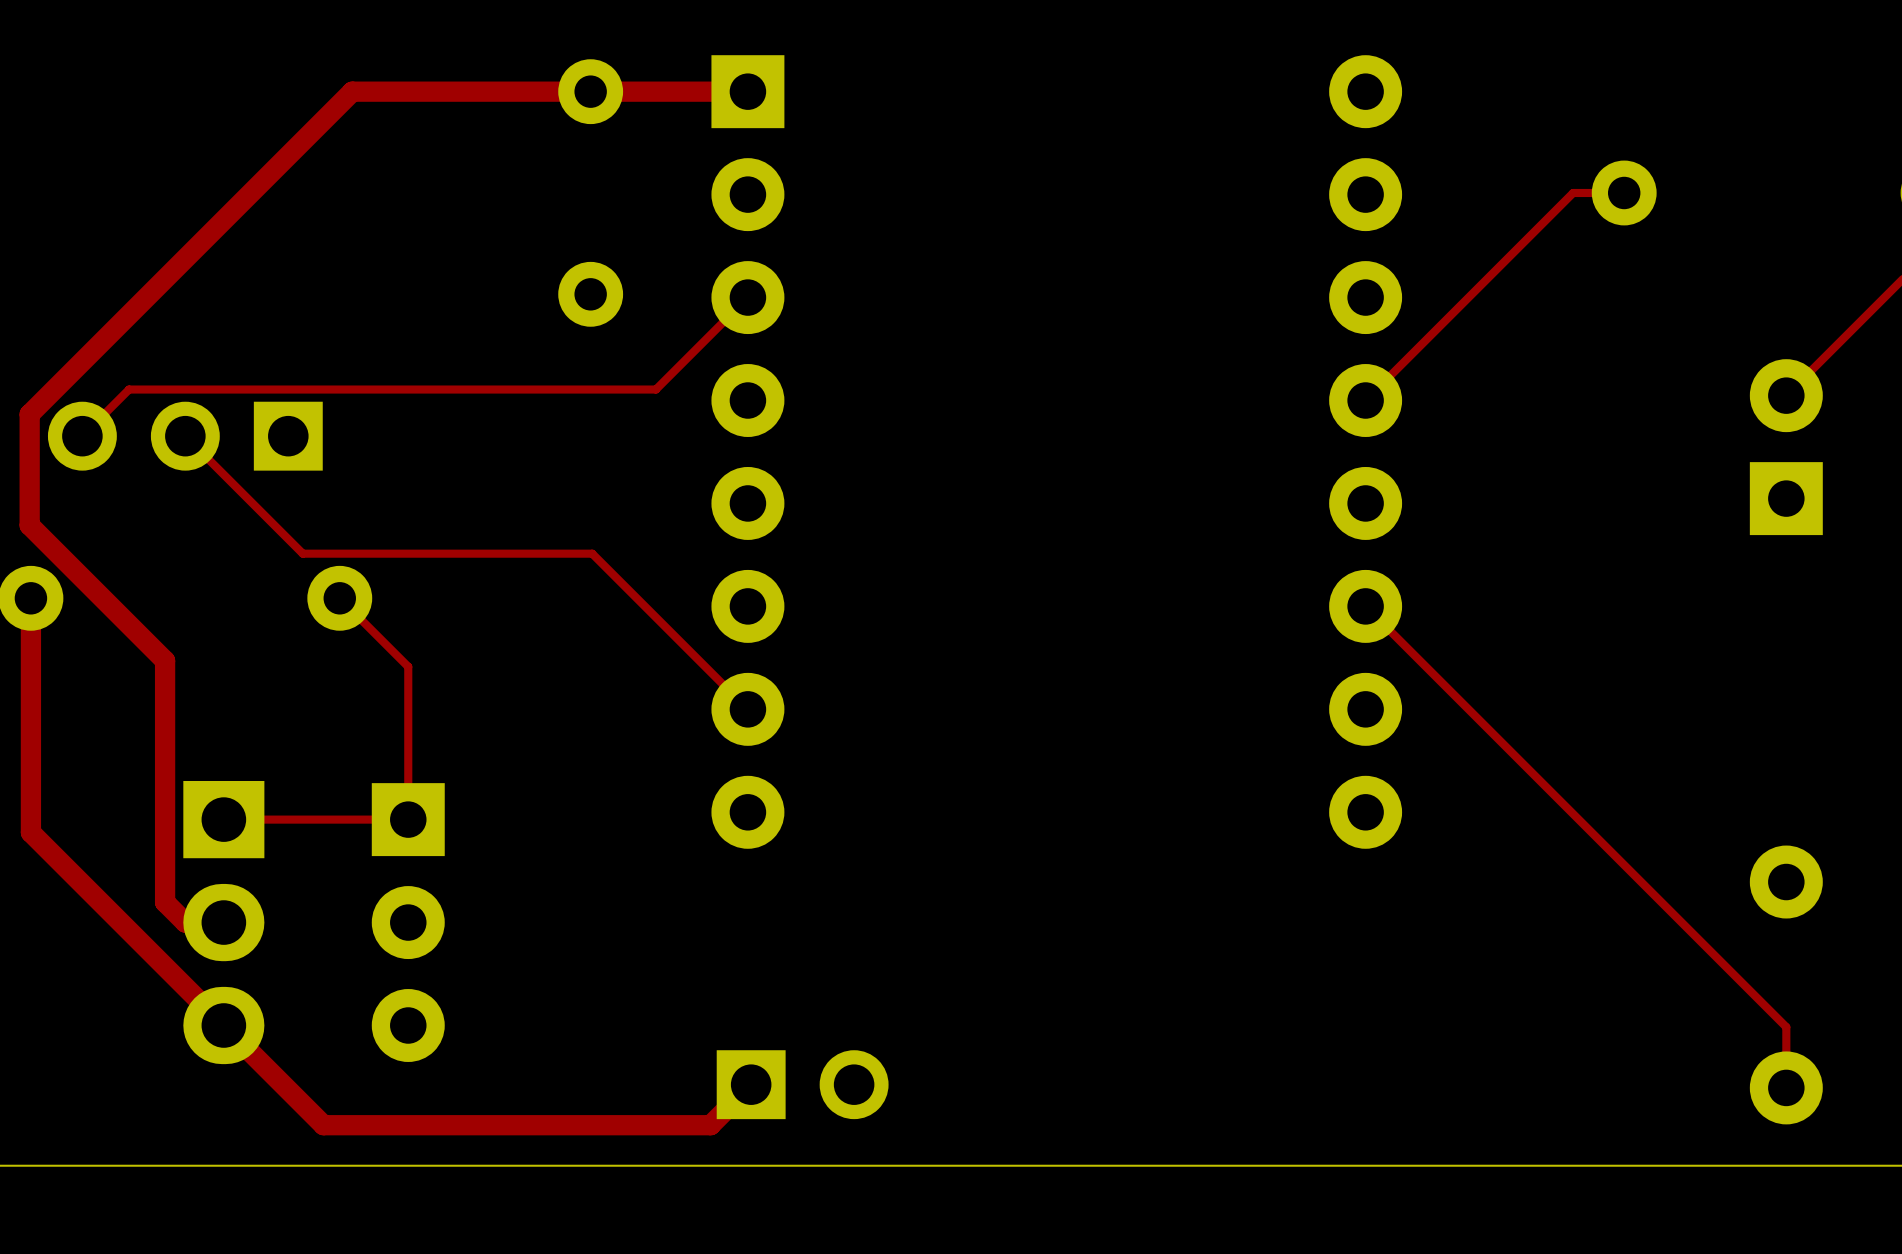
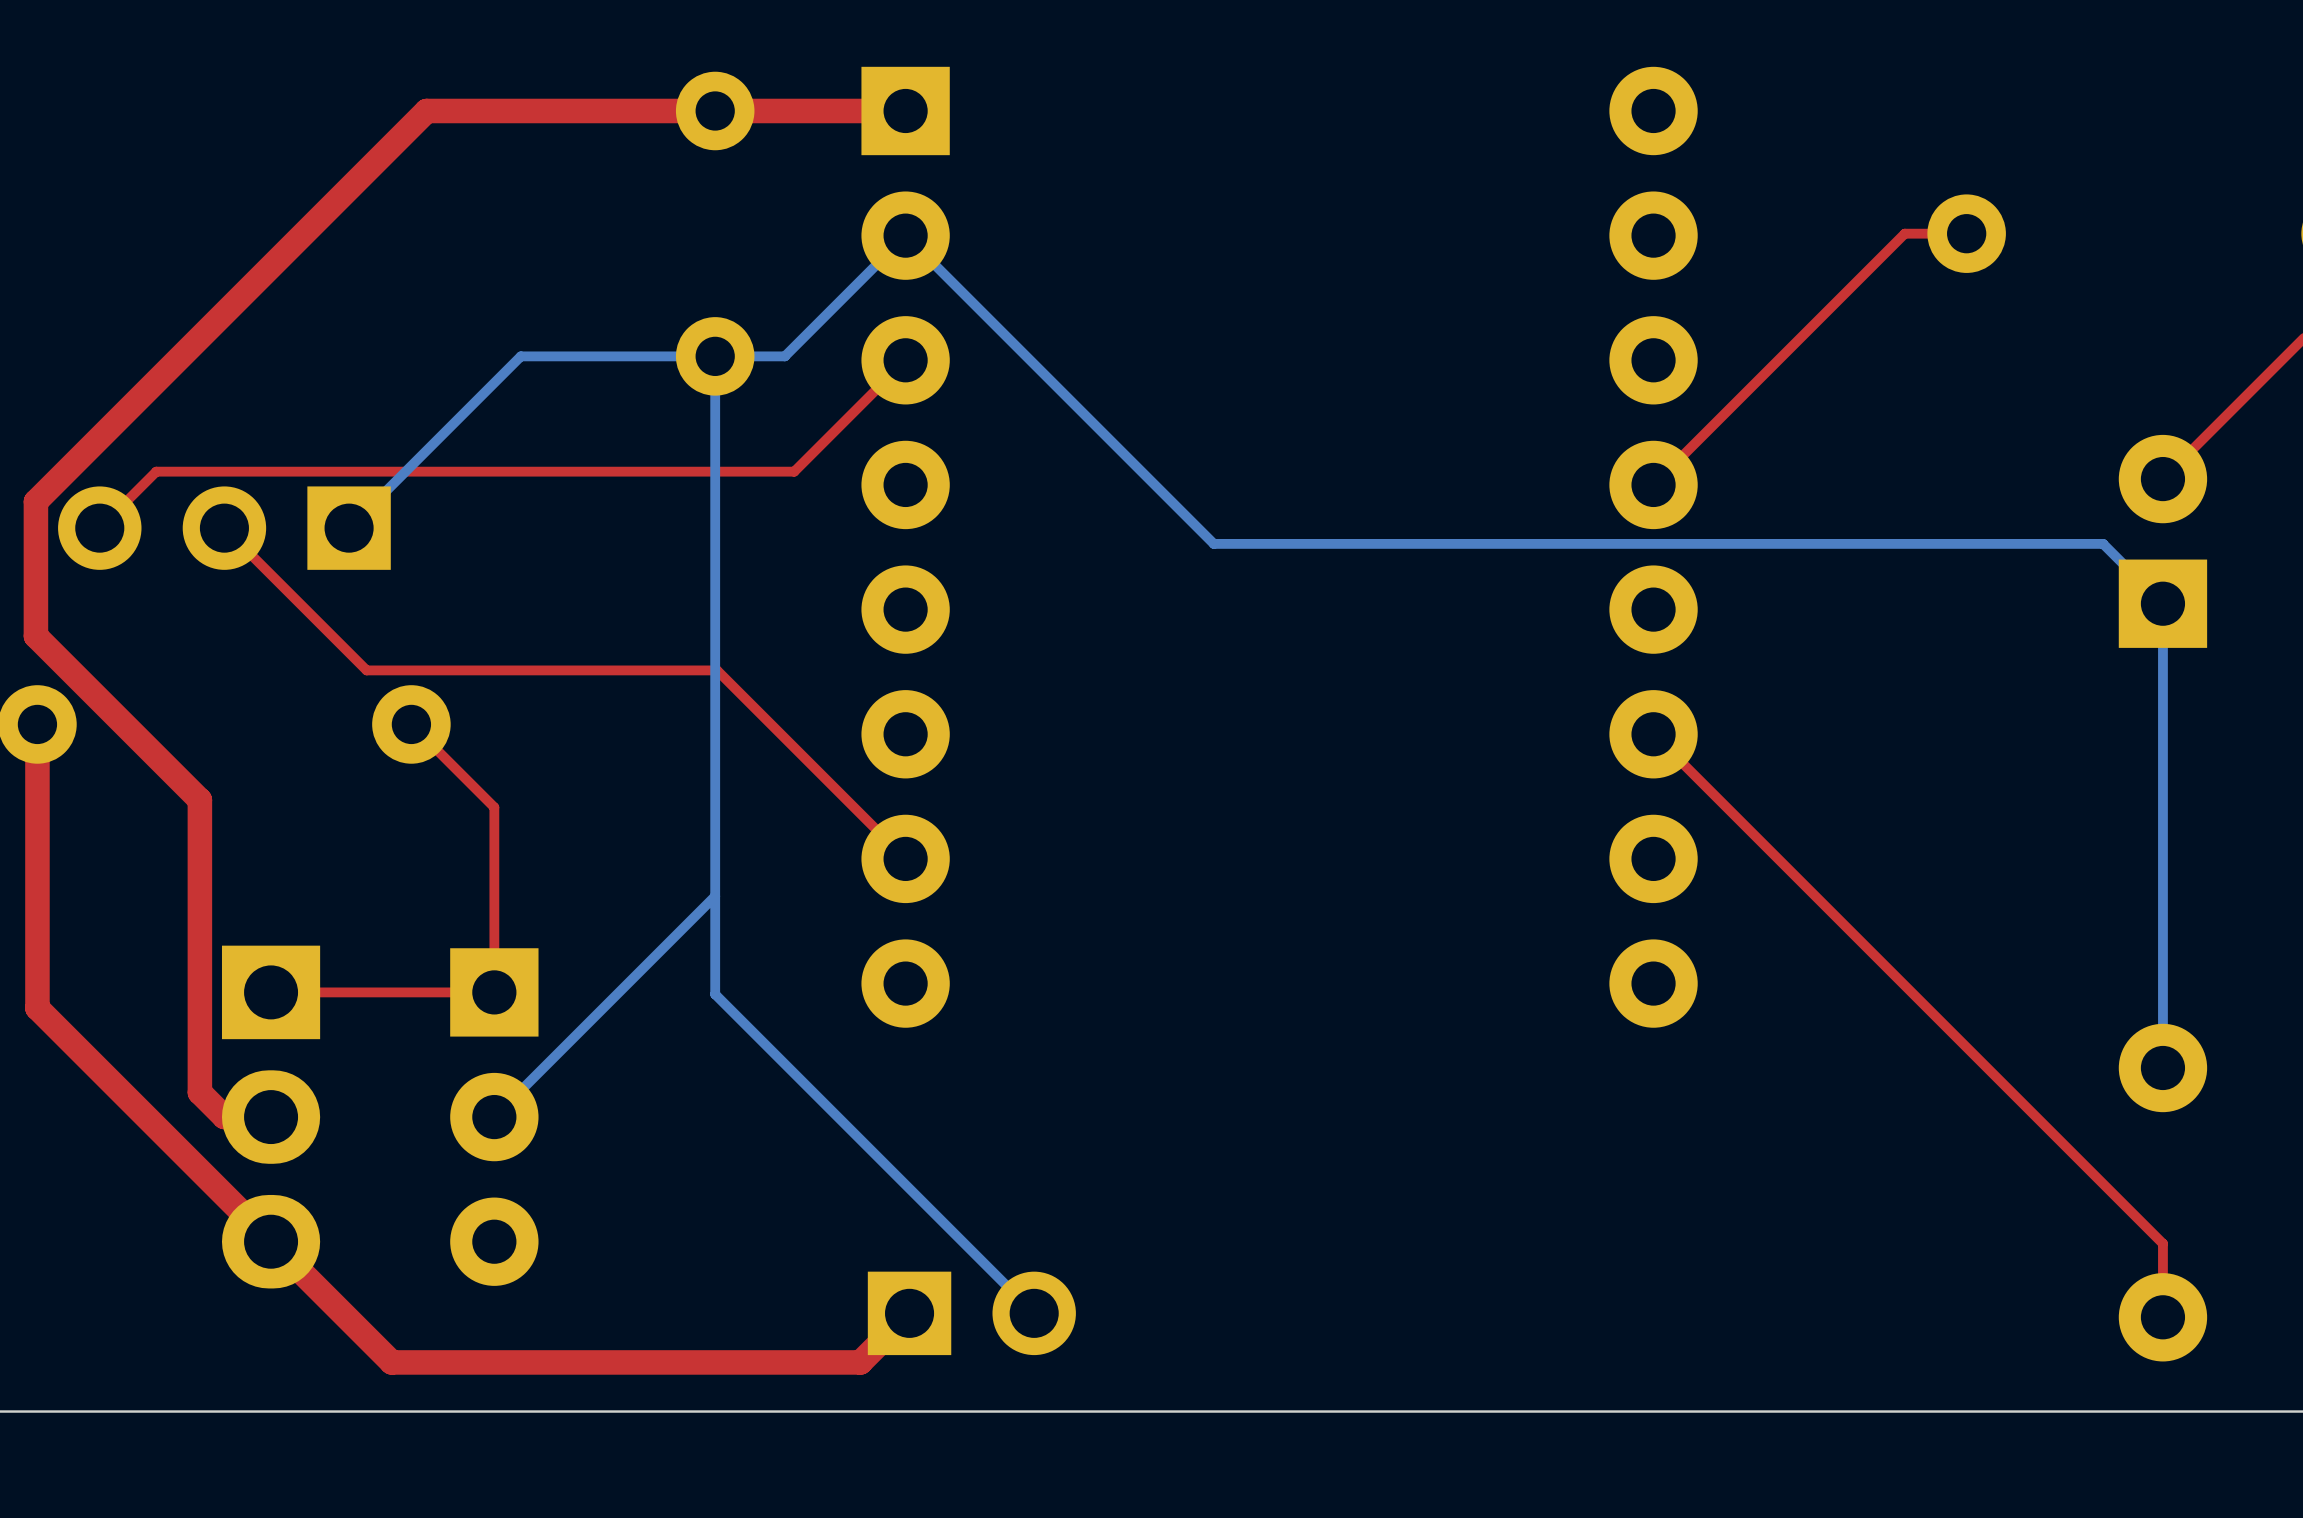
bottom track: none -> (715, 356) (715, 994) (1034, 1313)
bottom track: none -> (349, 528) (520, 356) (784, 356) (905, 235) (1213, 543) (2103, 543) (2162, 603) (2162, 1067)
bottom track: none -> (715, 896) (494, 1117)

